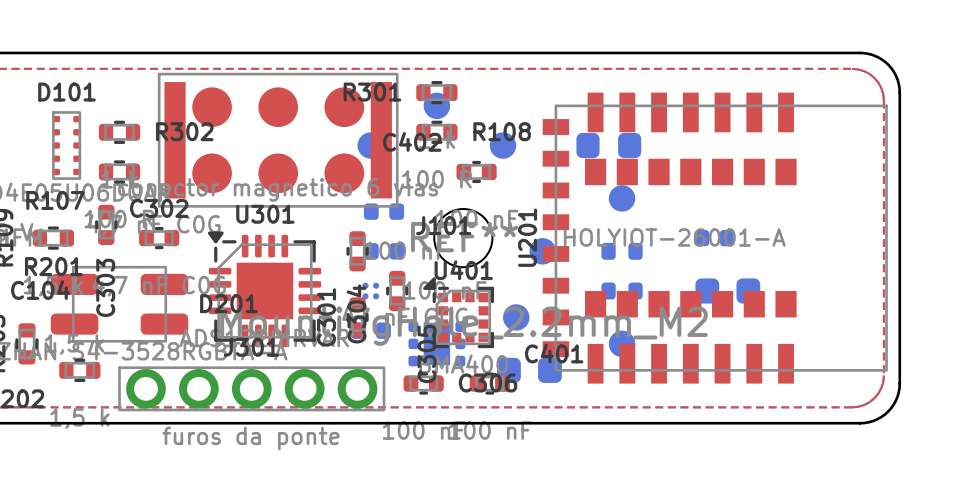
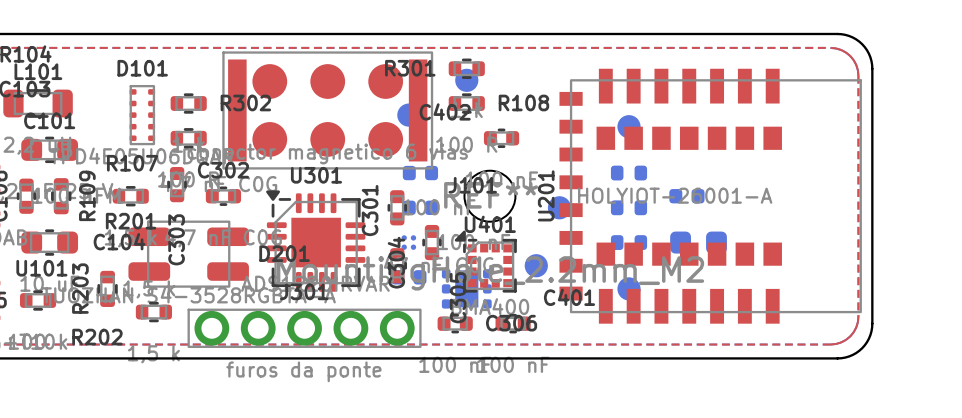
part footprint: [576, 132, 642, 159] -> [617, 115, 641, 139]
part: (503, 145) -> none
part footprint: [608, 185, 636, 212] -> [610, 165, 648, 181]
part position: (714, 238) -> (686, 196)
part position: (727, 291) -> (698, 242)
C301 name position: C301 (326, 317) -> C301 (370, 210)
part: (529, 370) -> none

